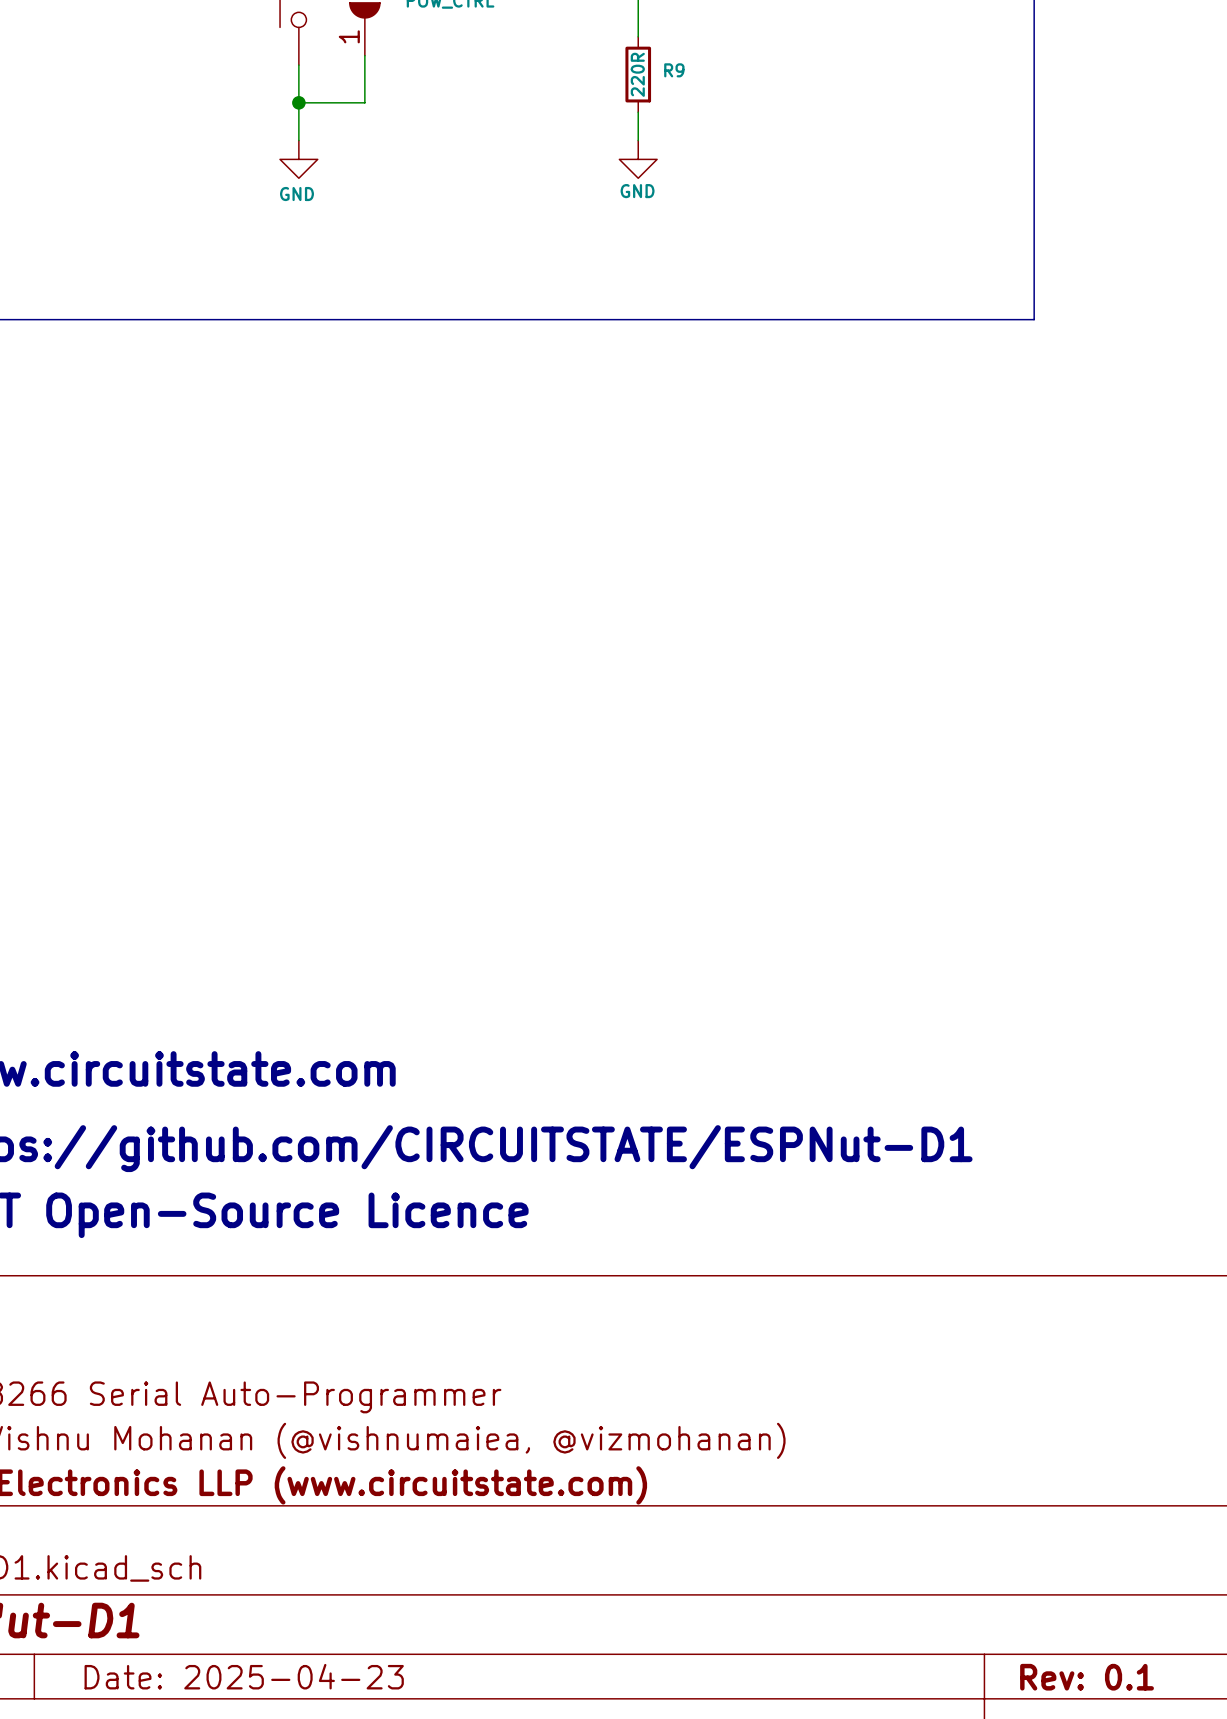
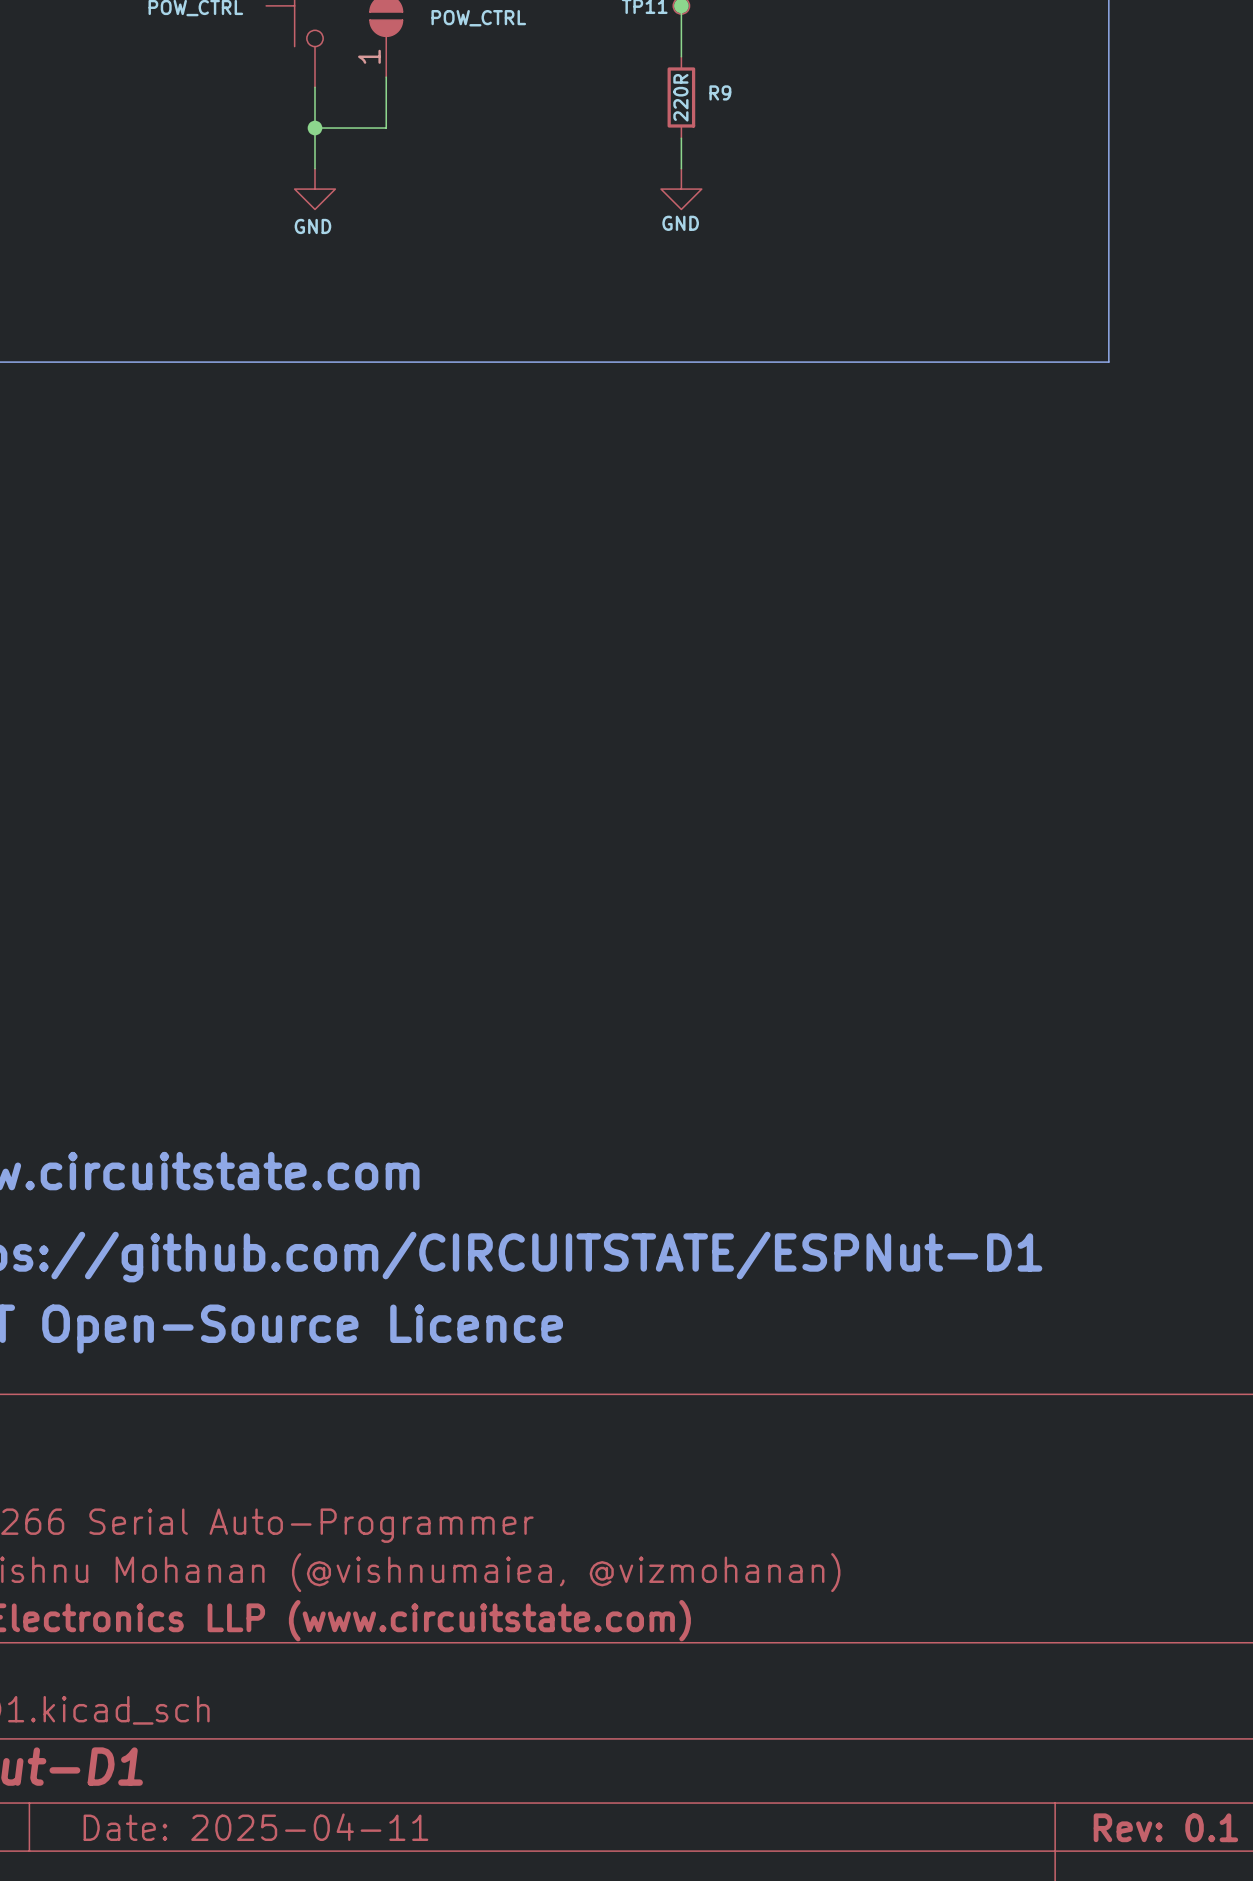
title block: Date: 2025-04-23 (244, 1676) -> Date: 2025-04-11 (255, 1827)

